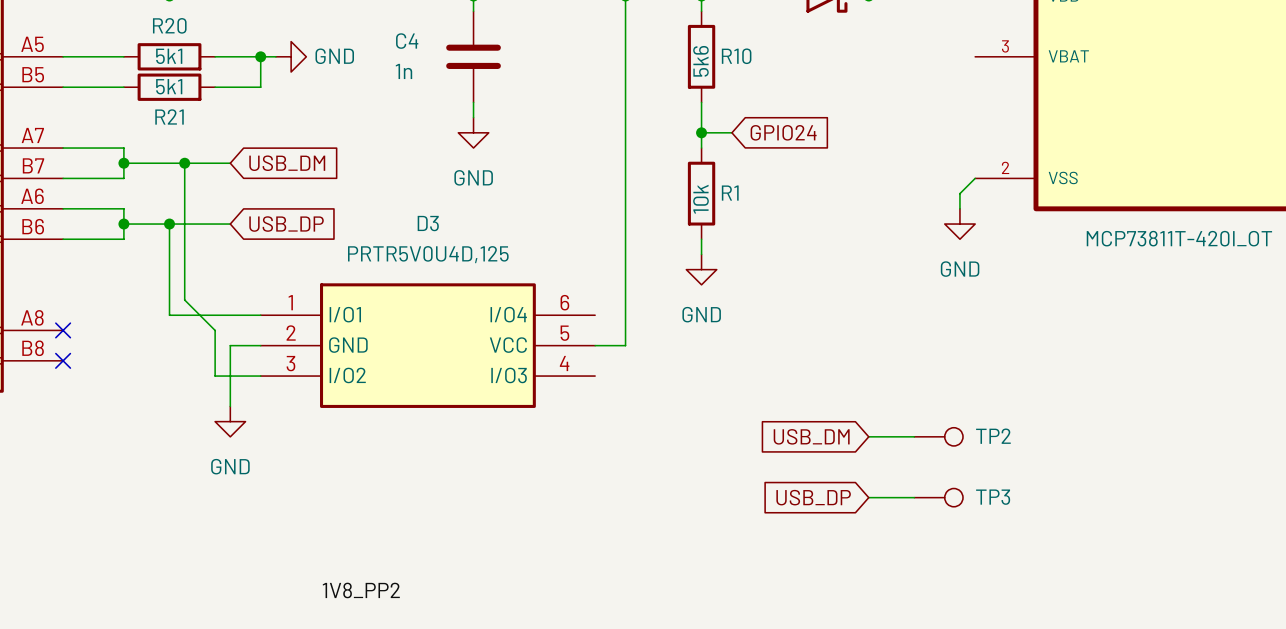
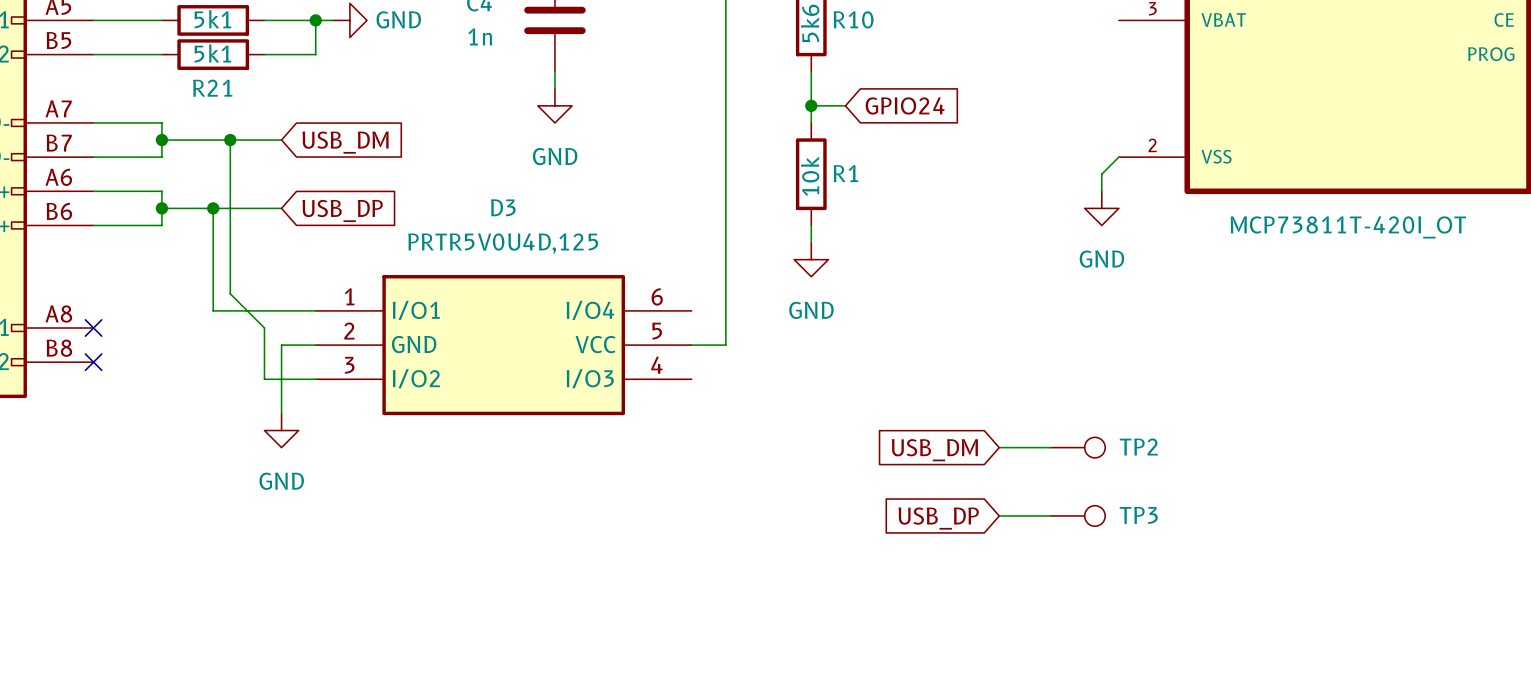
label: 1V8_PP2 (361, 590) -> none

